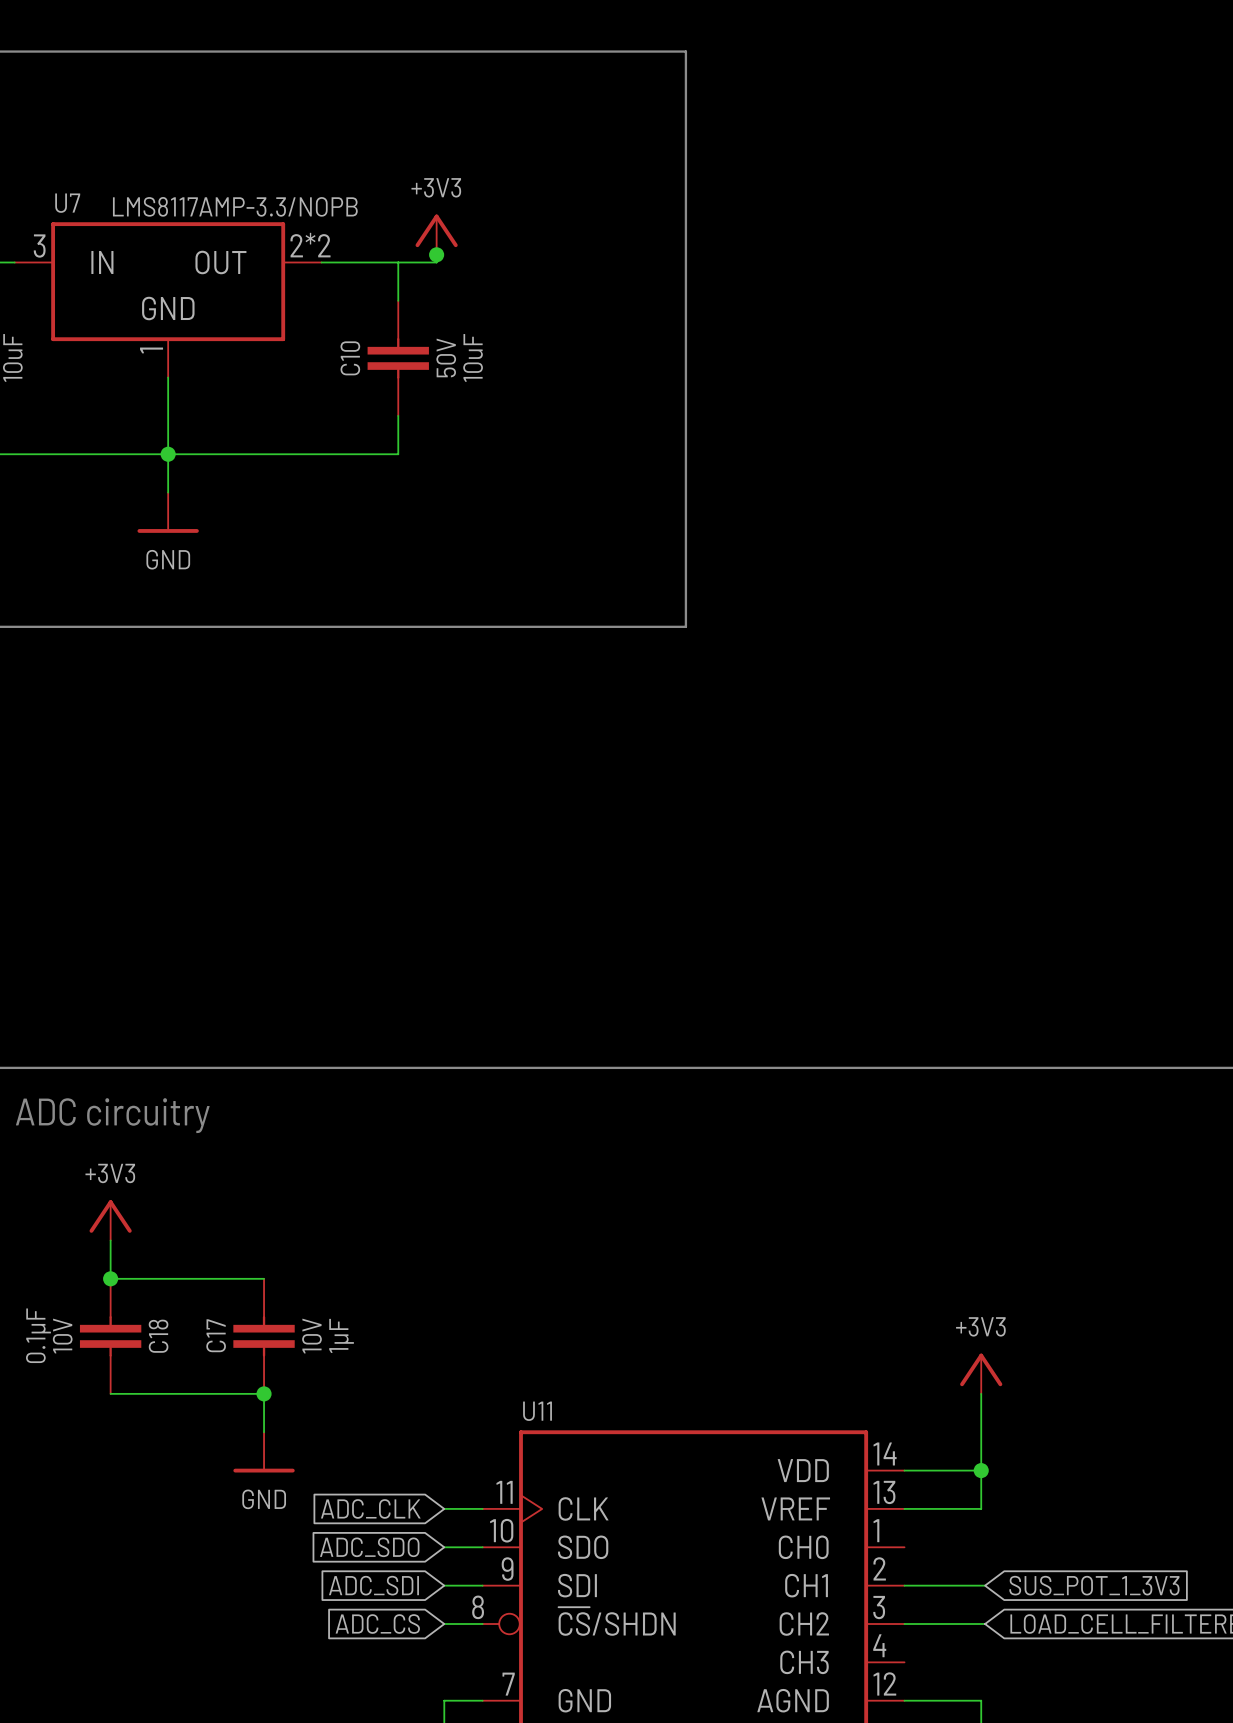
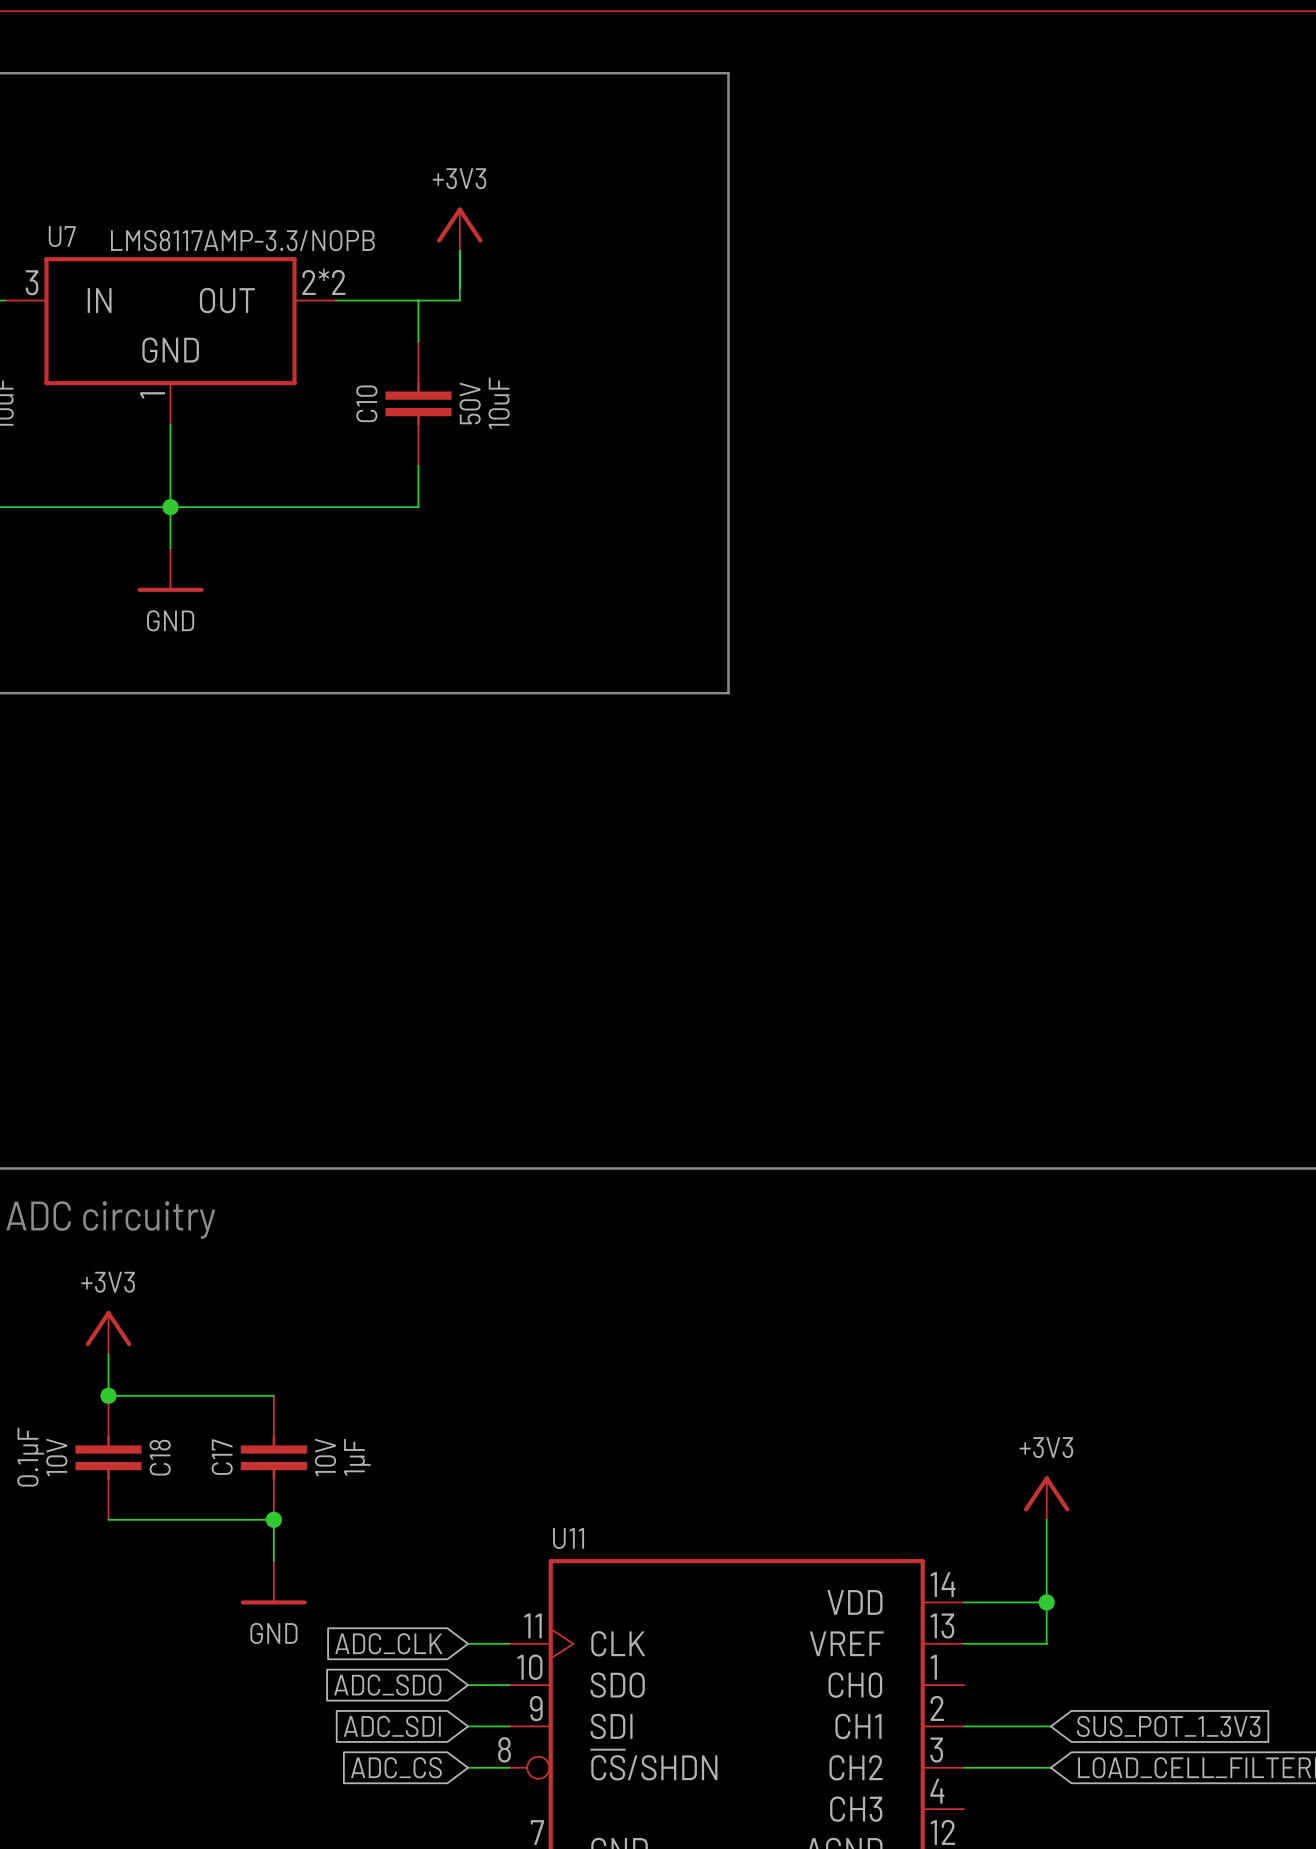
power symbol position: +3V3 (436, 234) -> +3V3 (459, 229)
junction: (436, 254) -> none

